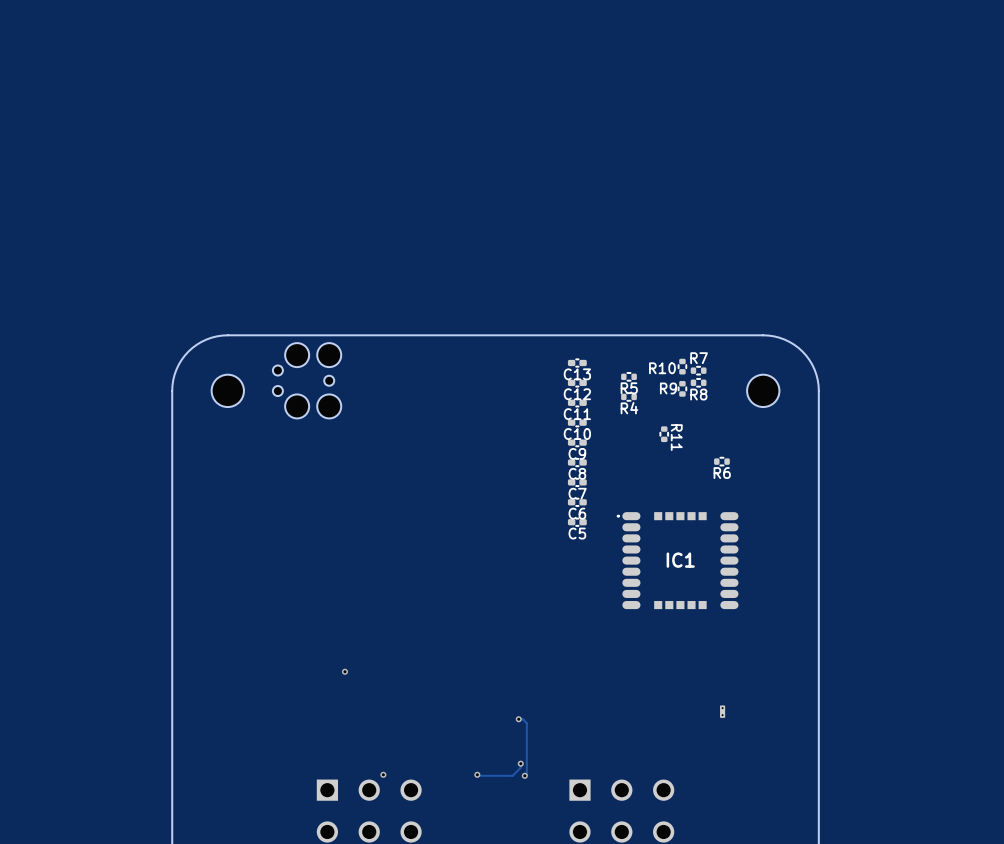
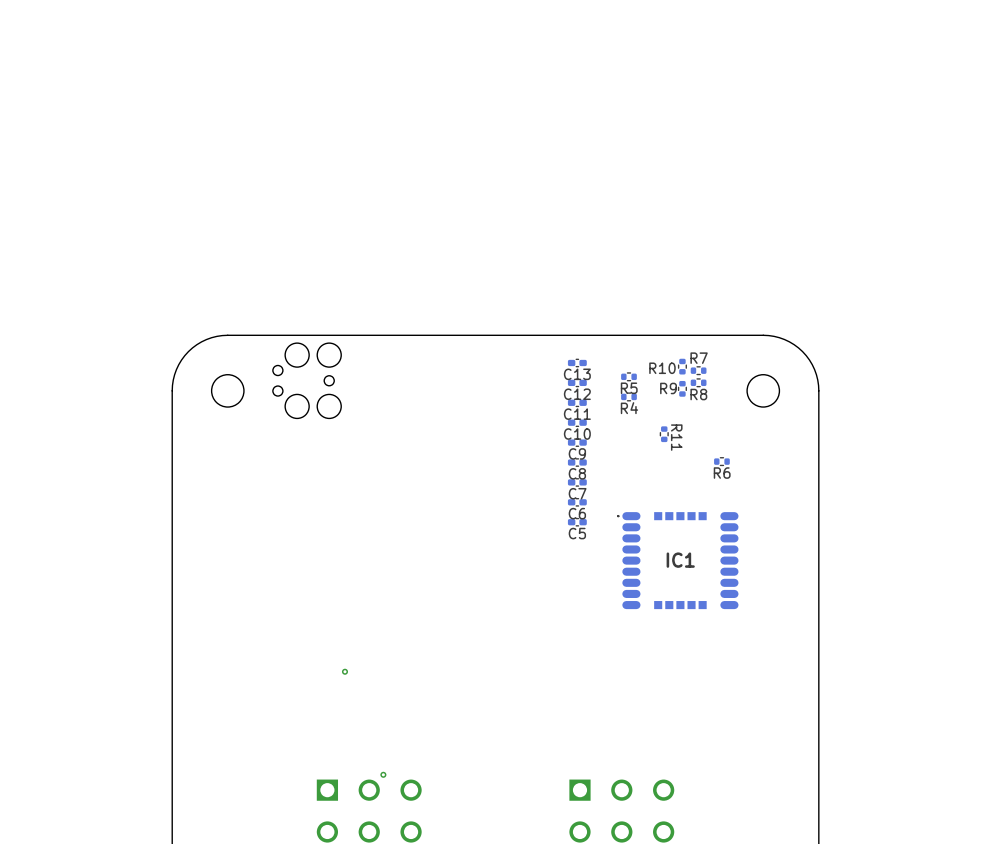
part: (722, 711) -> none
track: (518, 719) (522, 719) (526, 723) (526, 773) (524, 775) -> none
via: (518, 719) -> none
track: (520, 763) (520, 767) (512, 775) (477, 774) -> none
via: (520, 763) -> none
via: (477, 774) -> none
via: (524, 775) -> none

